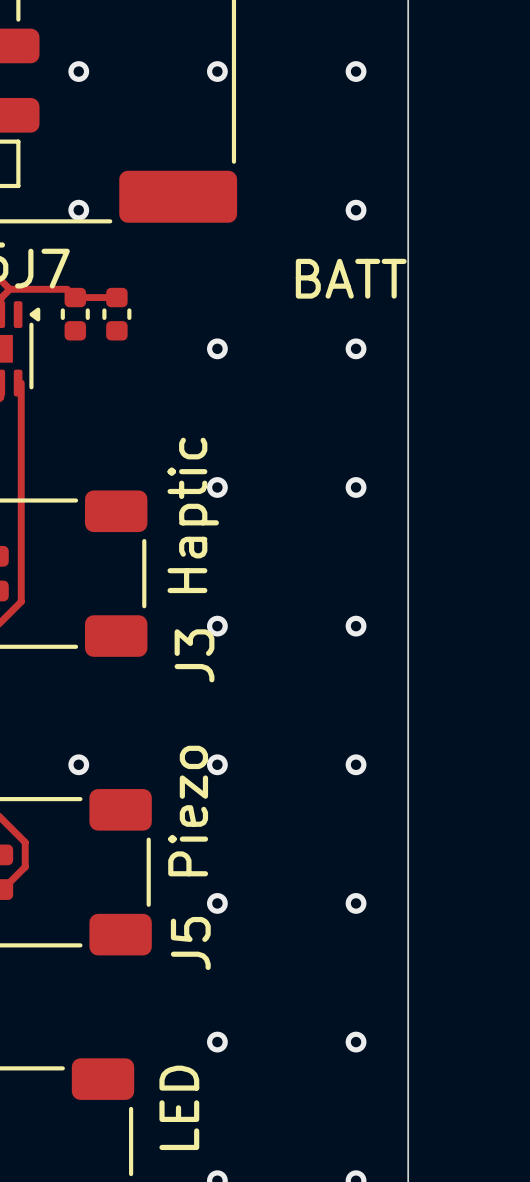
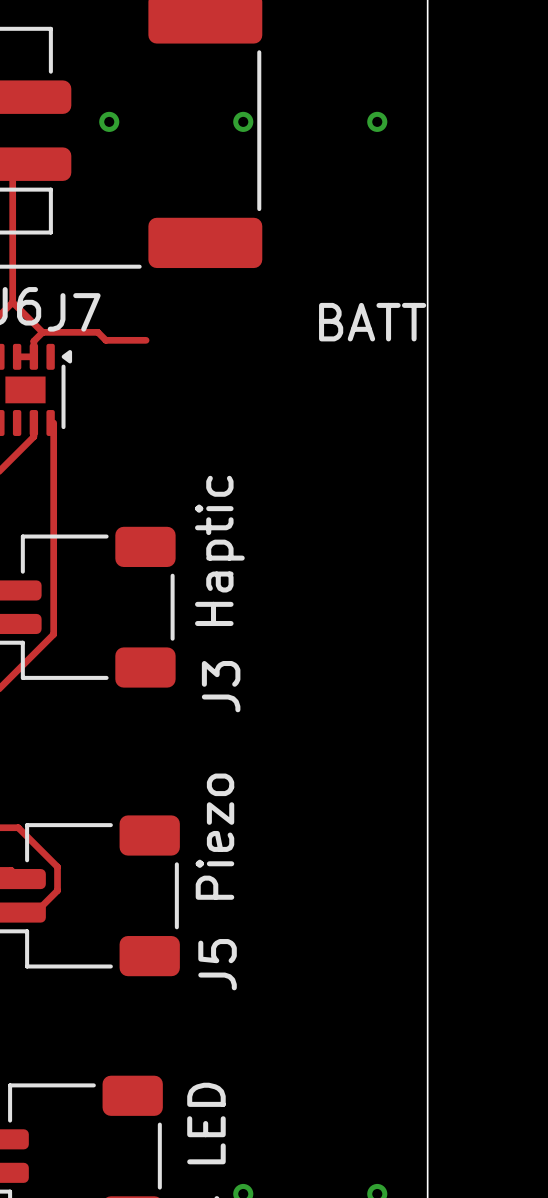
via: (78, 210) -> none
via: (356, 210) -> none
part: (75, 314) -> none
part: (116, 314) -> none
via: (217, 348) -> none
via: (356, 348) -> none
via: (217, 487) -> none
via: (356, 487) -> none
via: (217, 626) -> none
via: (356, 626) -> none
via: (78, 764) -> none
via: (217, 764) -> none
via: (356, 764) -> none
via: (217, 903) -> none
via: (356, 903) -> none
via: (217, 1042) -> none
via: (356, 1042) -> none

